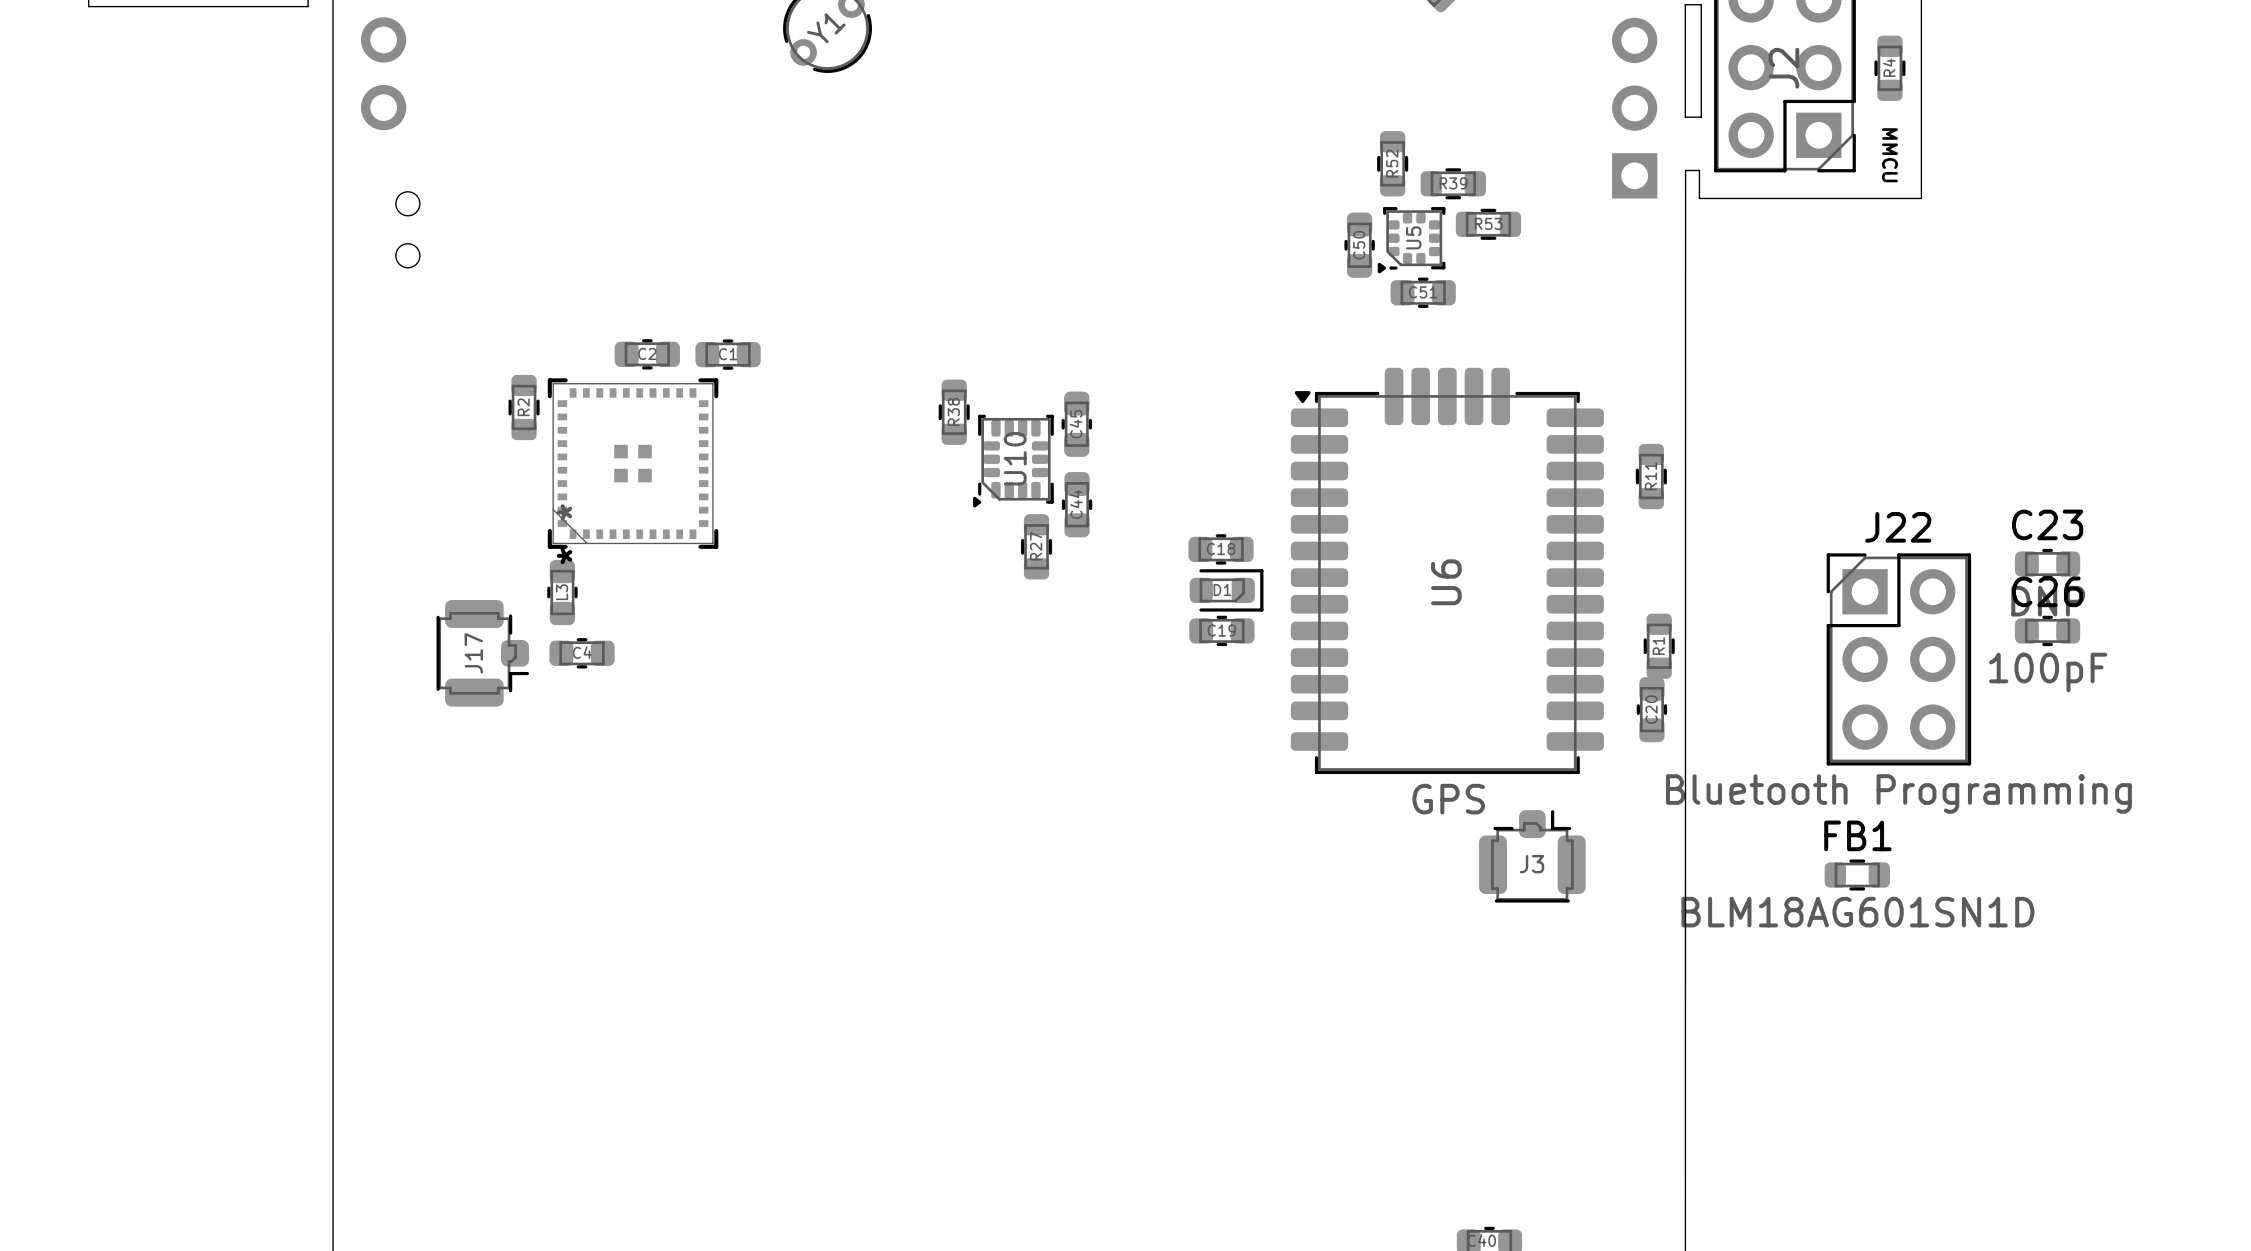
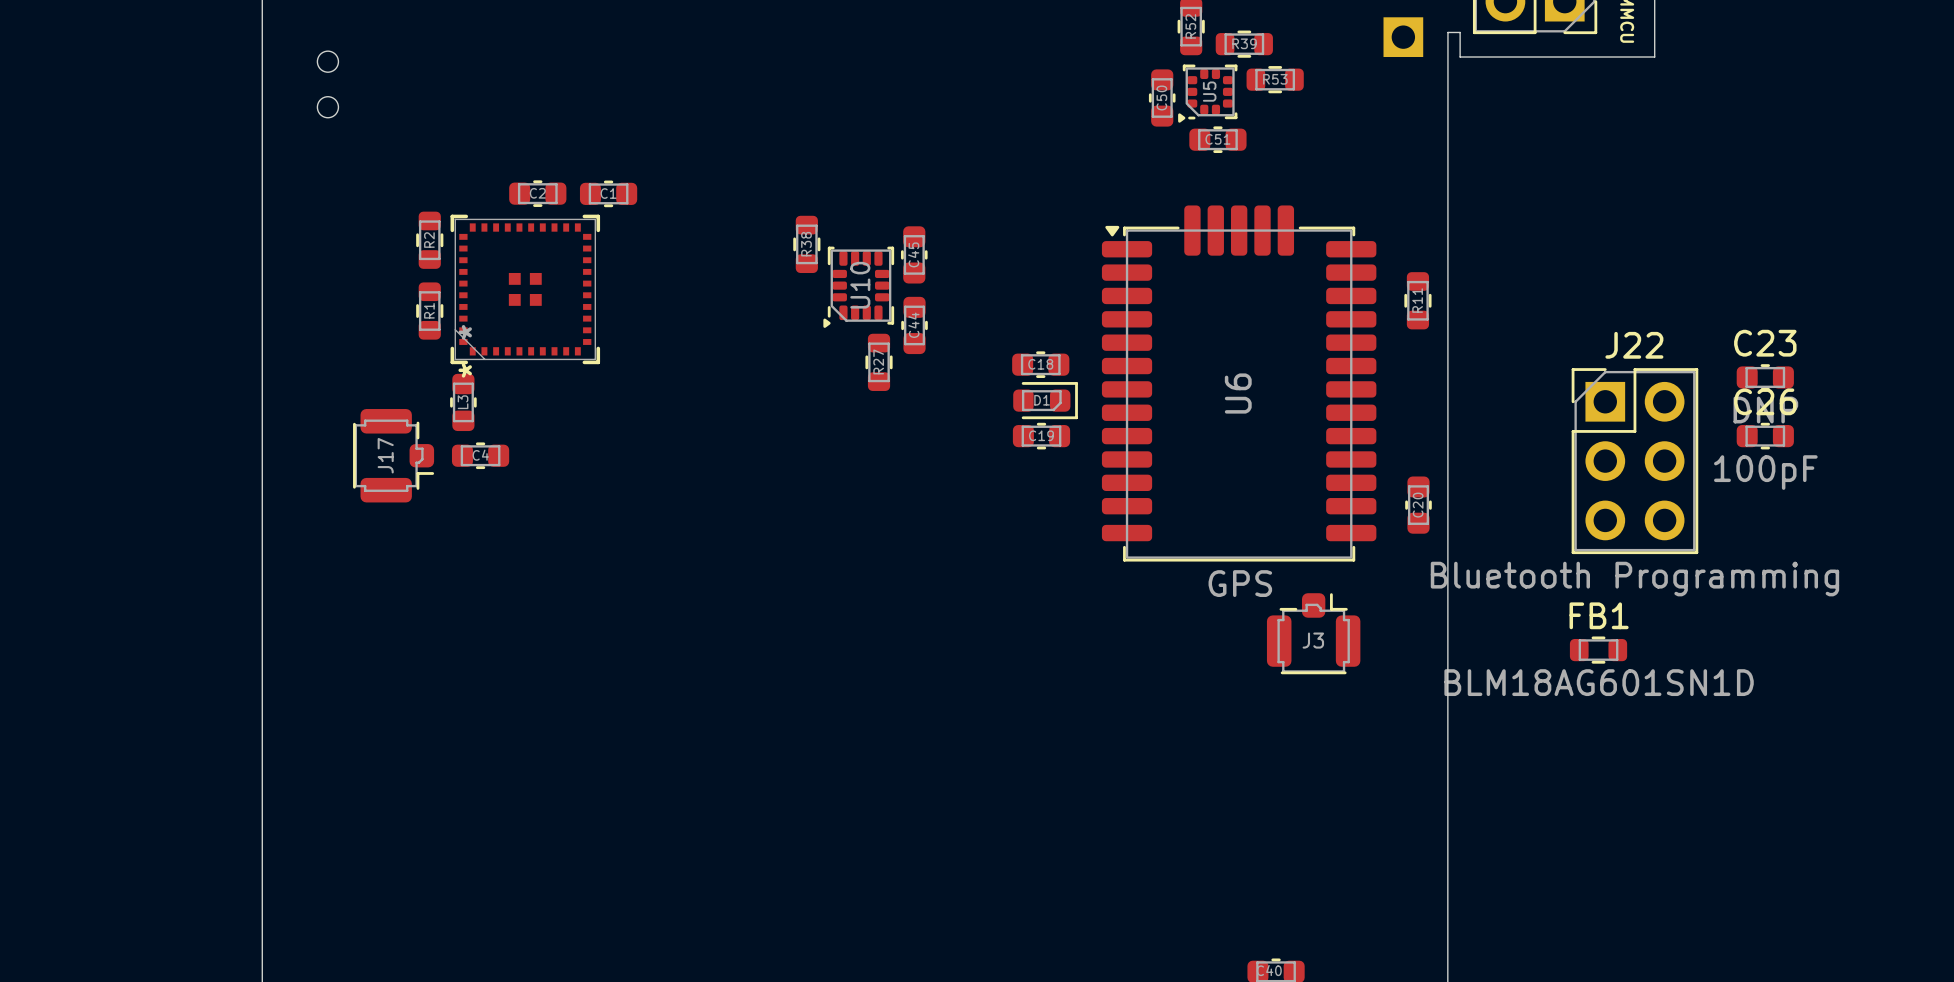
R1 position: (1659, 646) -> (429, 311)

